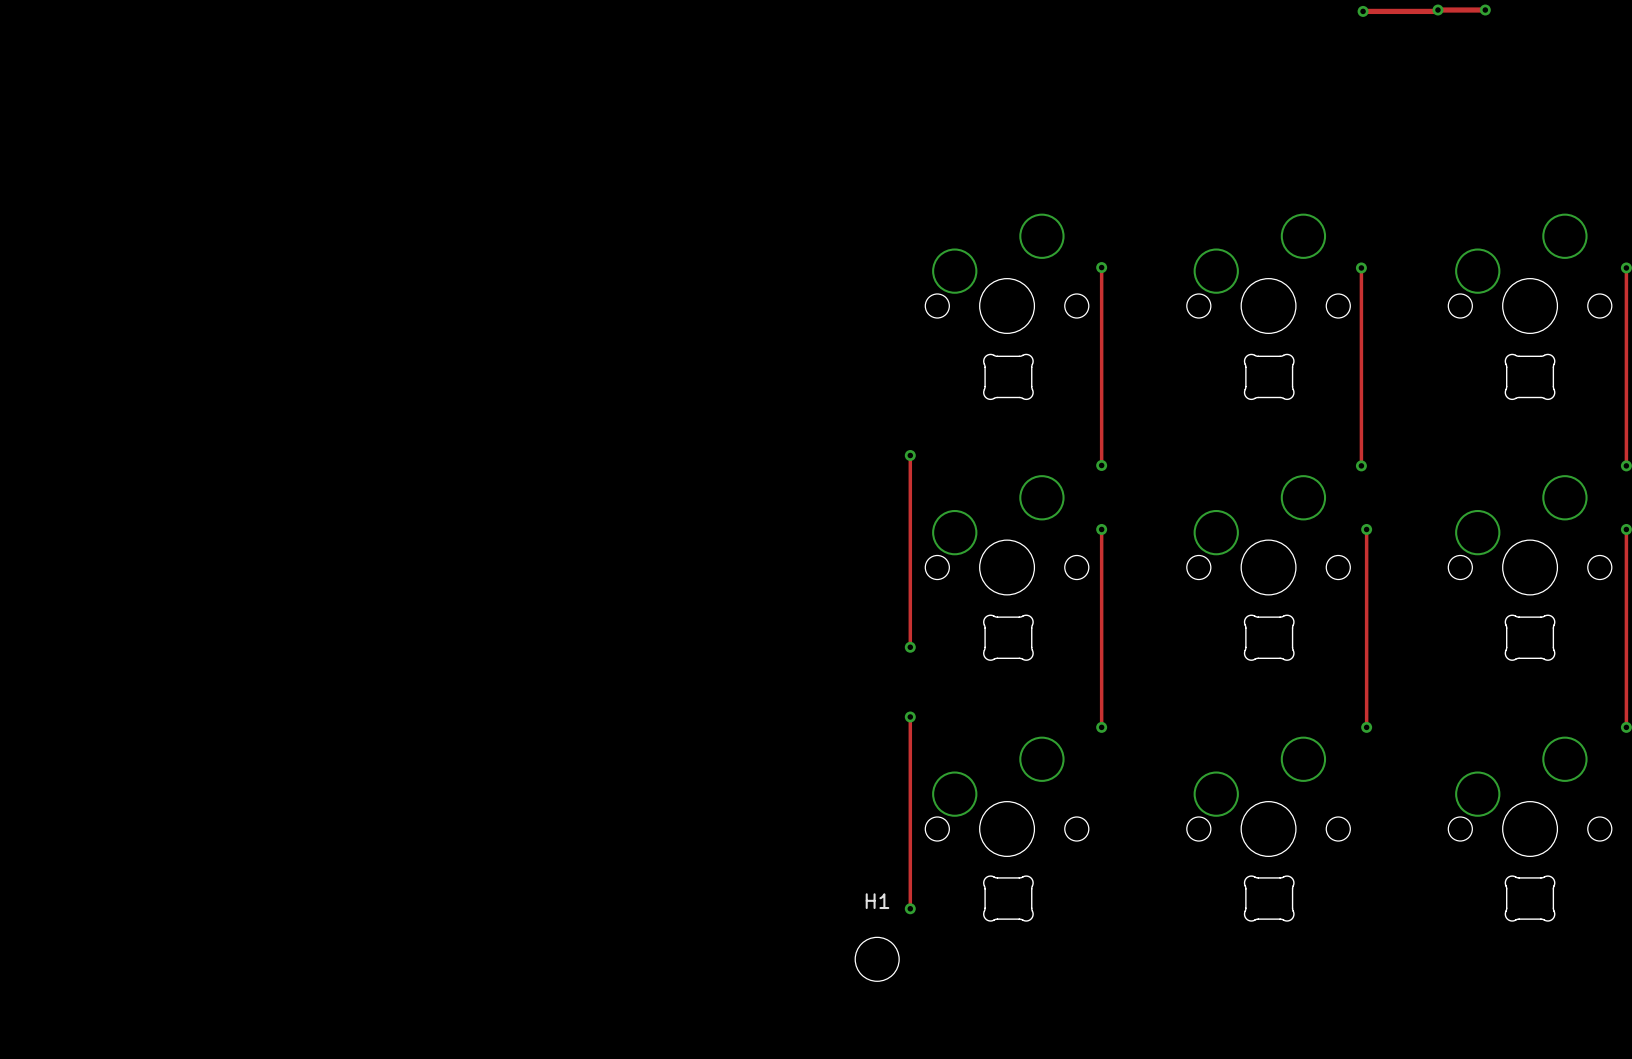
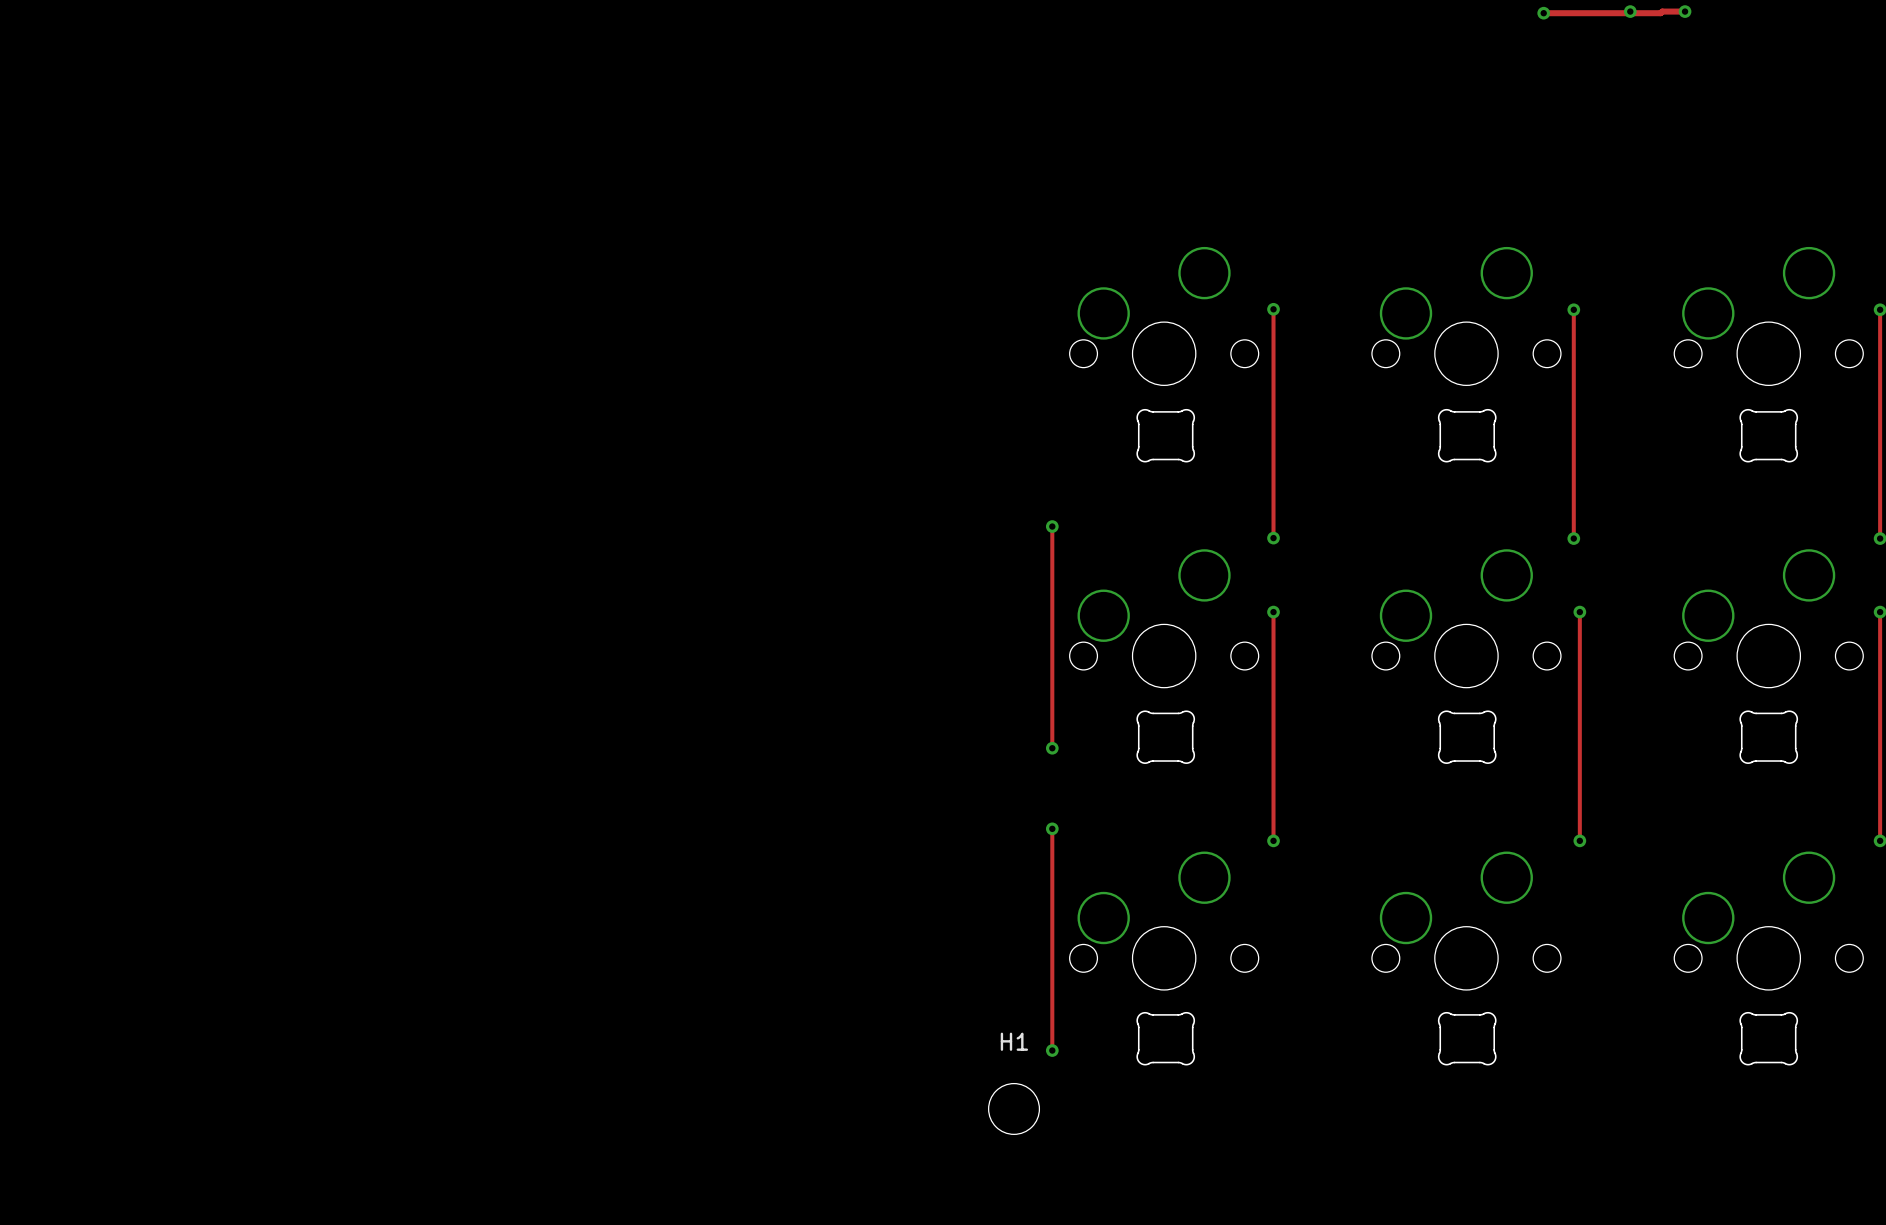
via: none -> (1630, 11)
via: (1437, 10) -> none
track: (1457, 10) (1485, 10) -> (1543, 13) (1575, 13)
via: none -> (1685, 11)
via: (1485, 10) -> none
via: none -> (1543, 13)
via: (1363, 11) -> none

